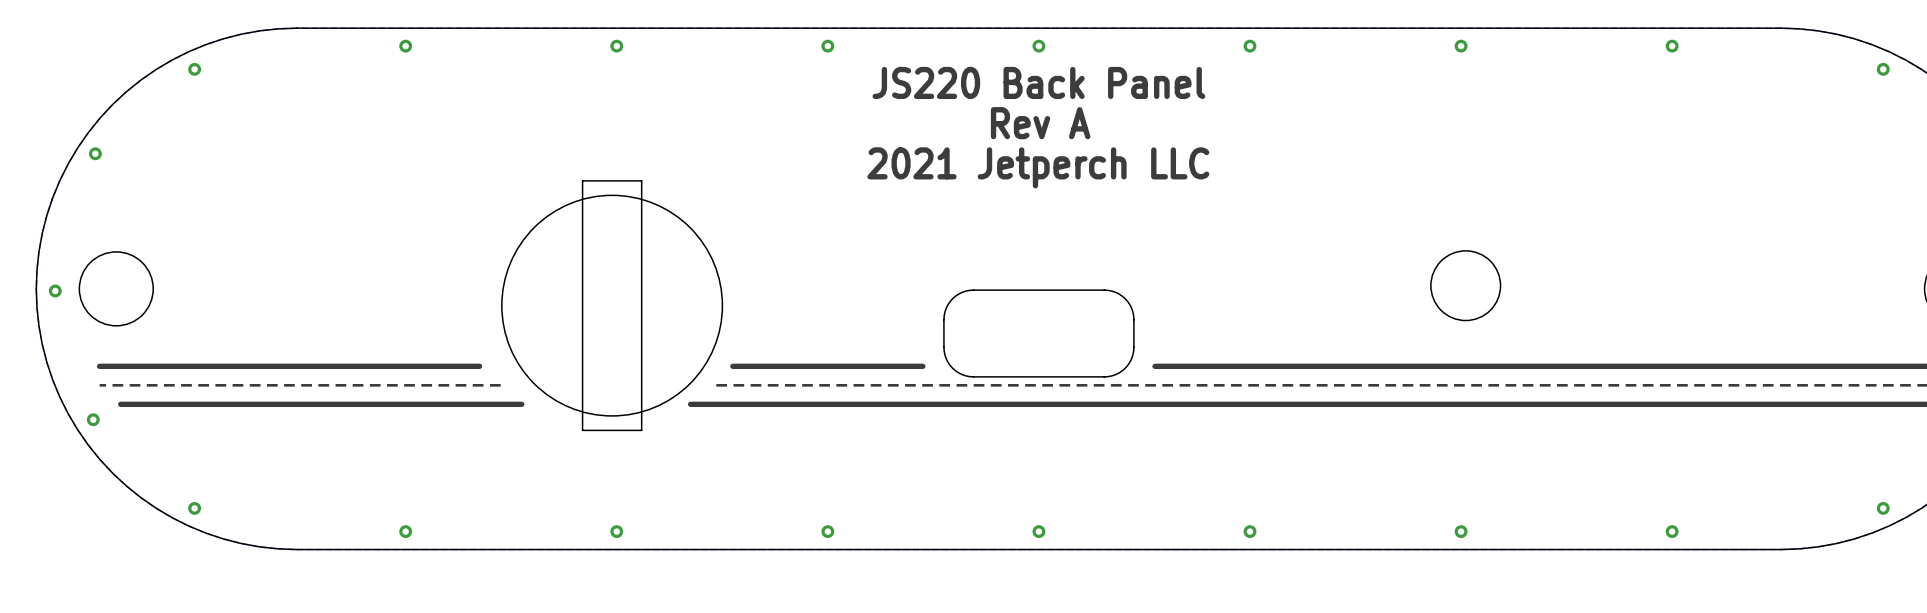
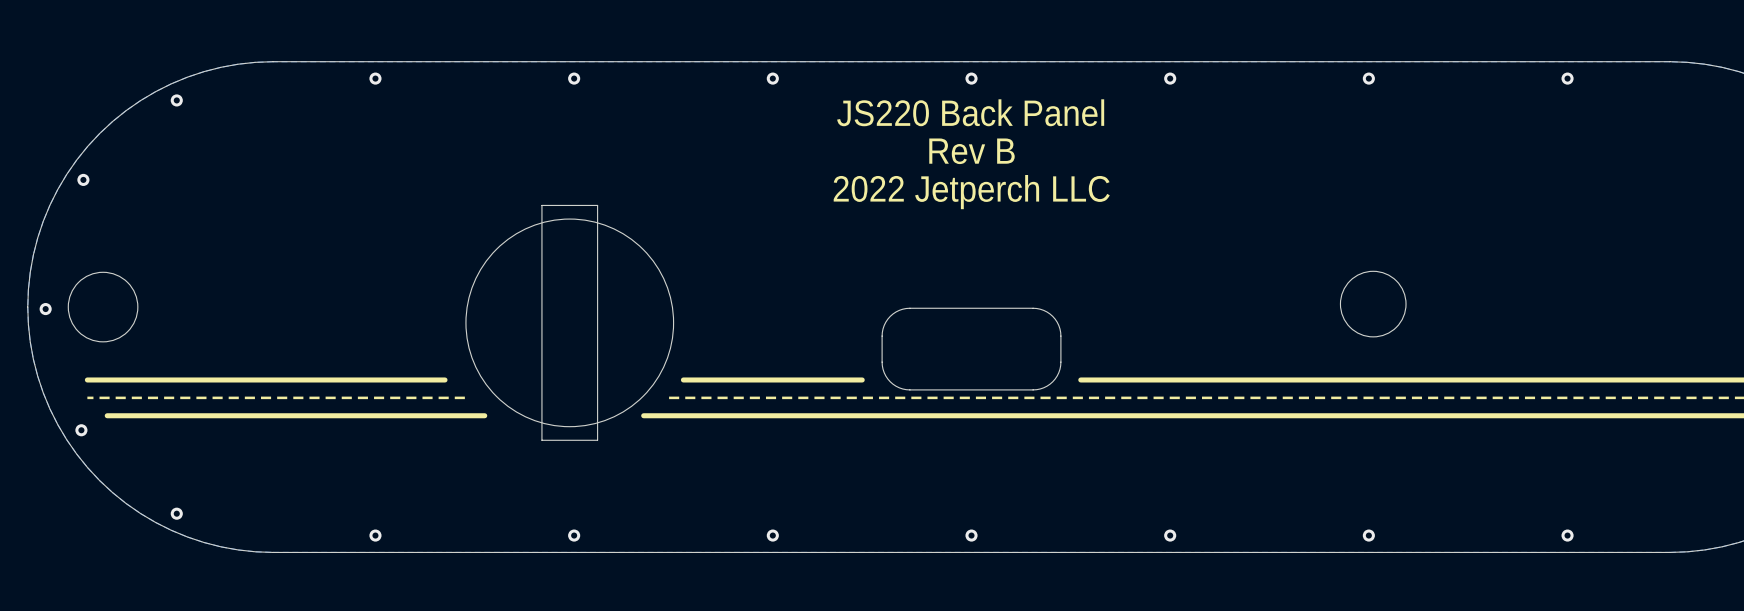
text: Rev A (1040, 123) -> Rev B (971, 151)
text: 2021 Jetperch LLC (1038, 167) -> 2022 Jetperch LLC (971, 192)

